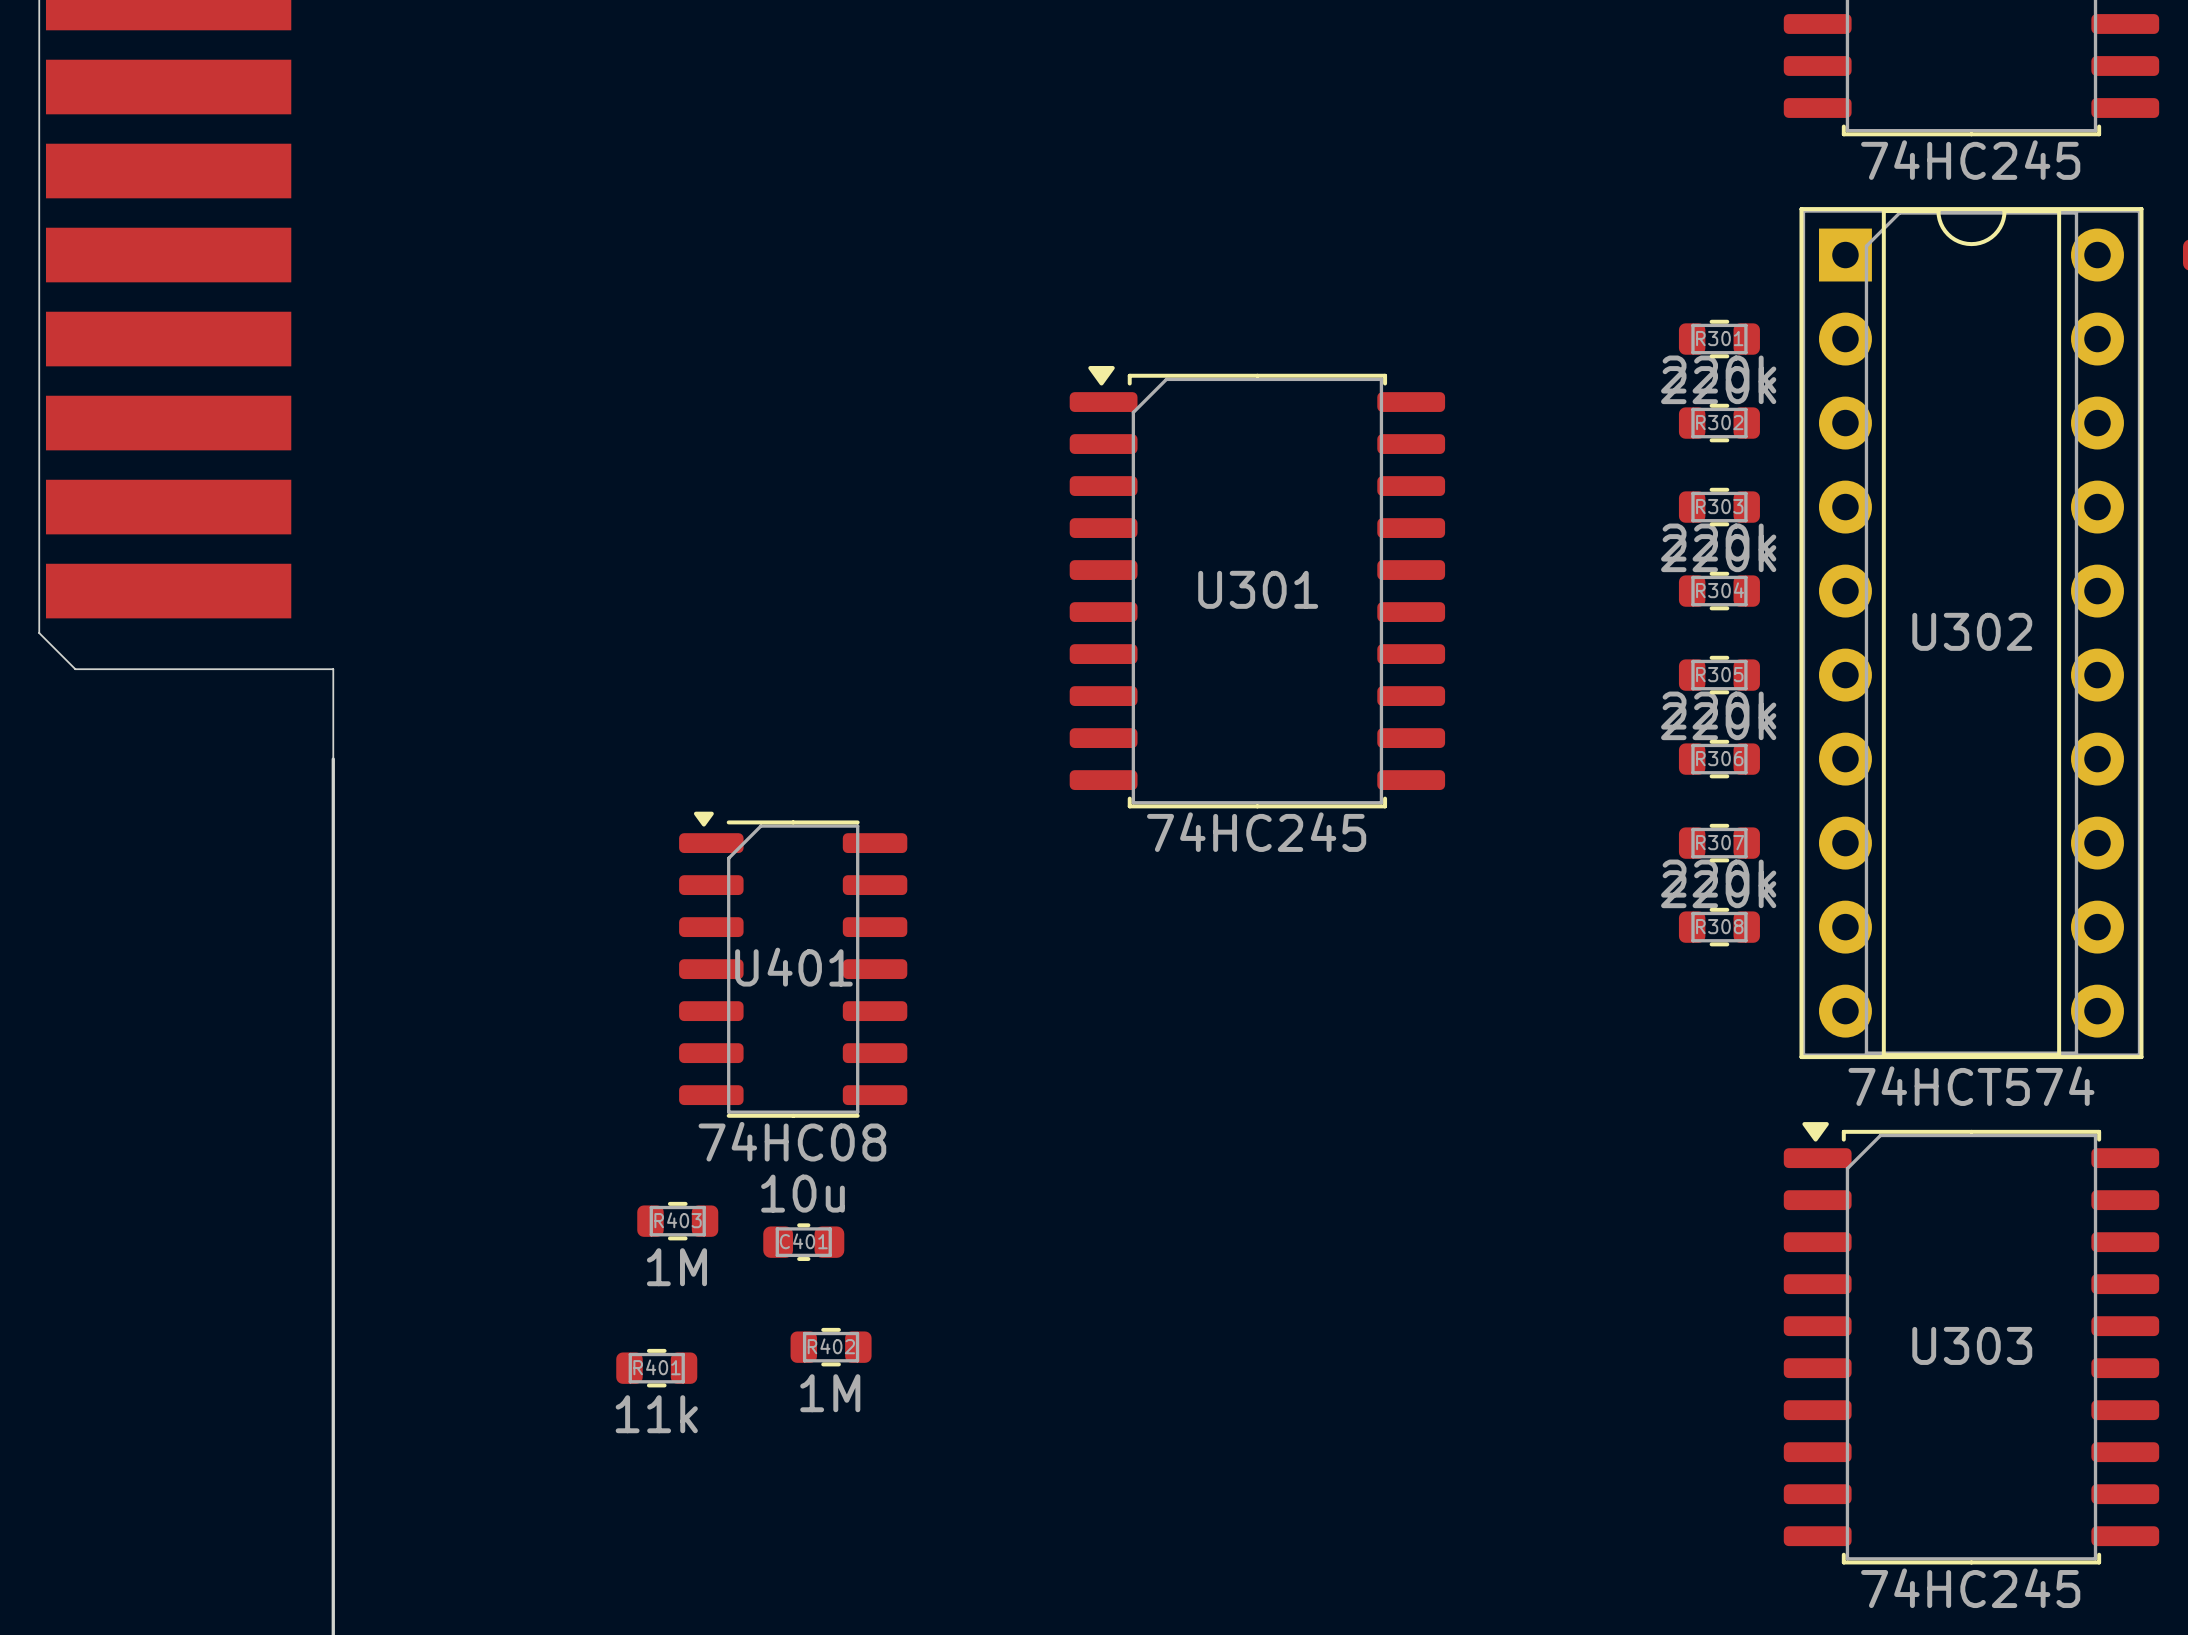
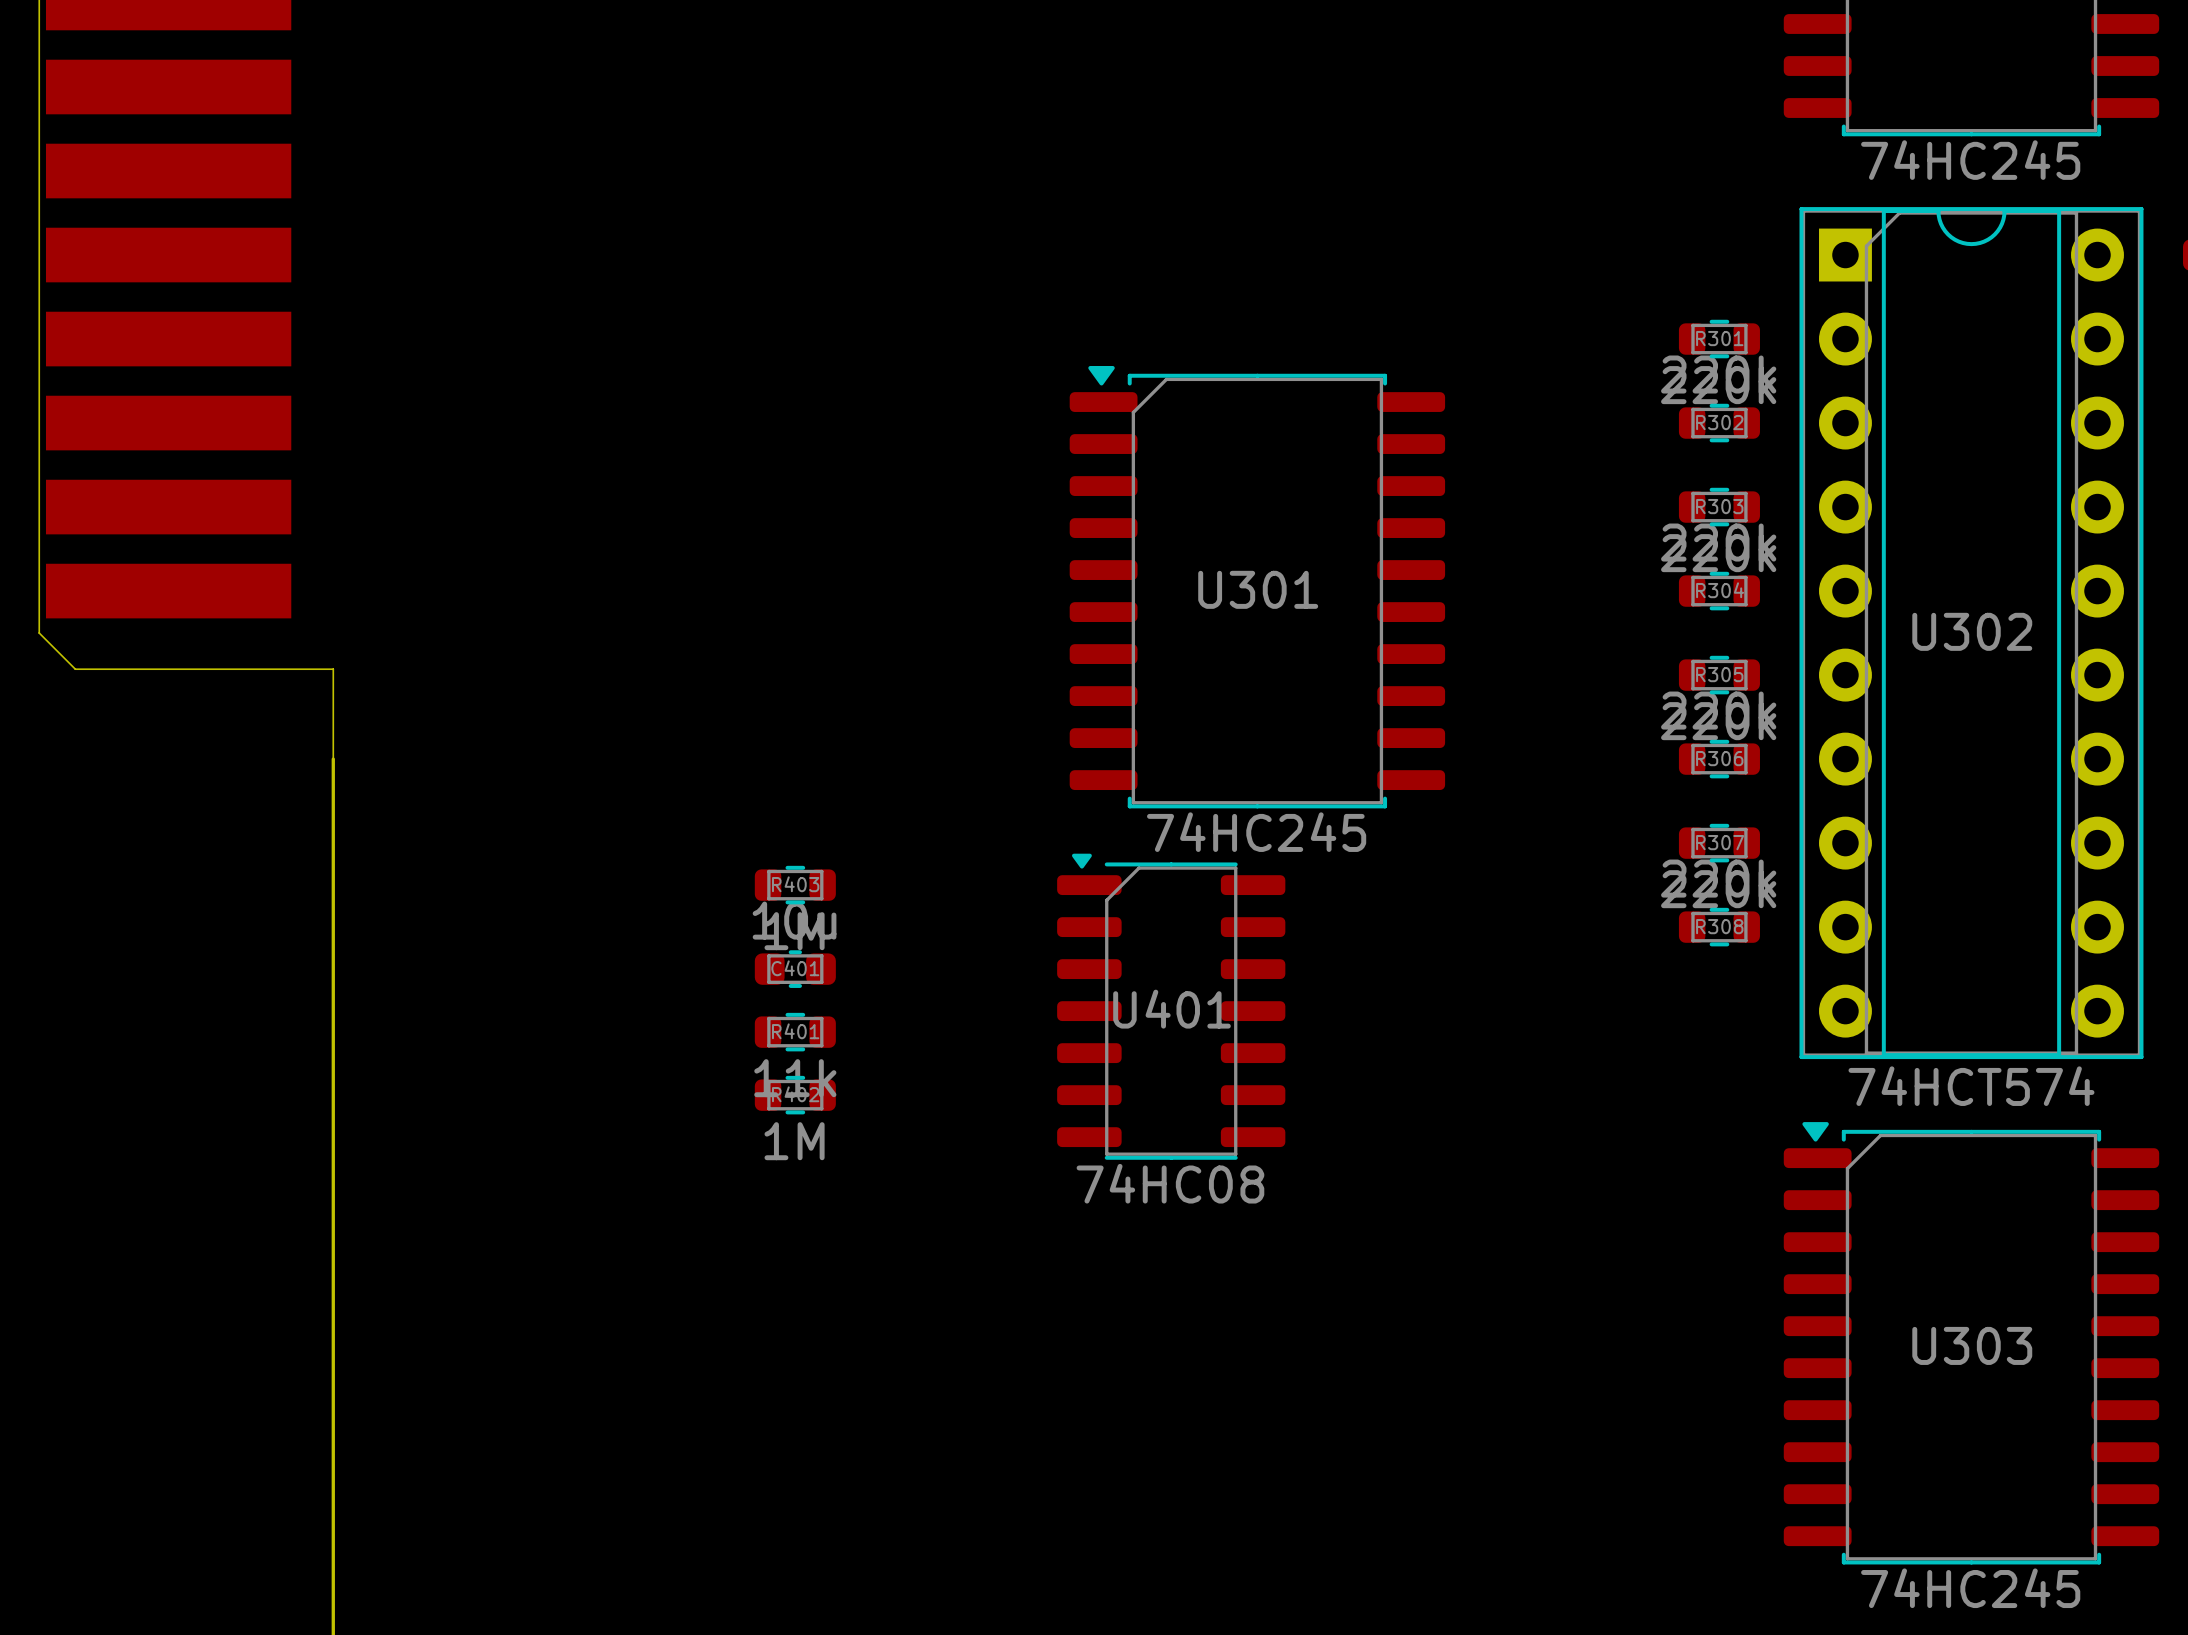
U401 position: (793, 964) -> (1171, 1006)
R403 position: (677, 1221) -> (795, 885)
C401 position: (803, 1242) -> (795, 969)
R402 position: (831, 1347) -> (795, 1095)
R401 position: (656, 1368) -> (795, 1032)

